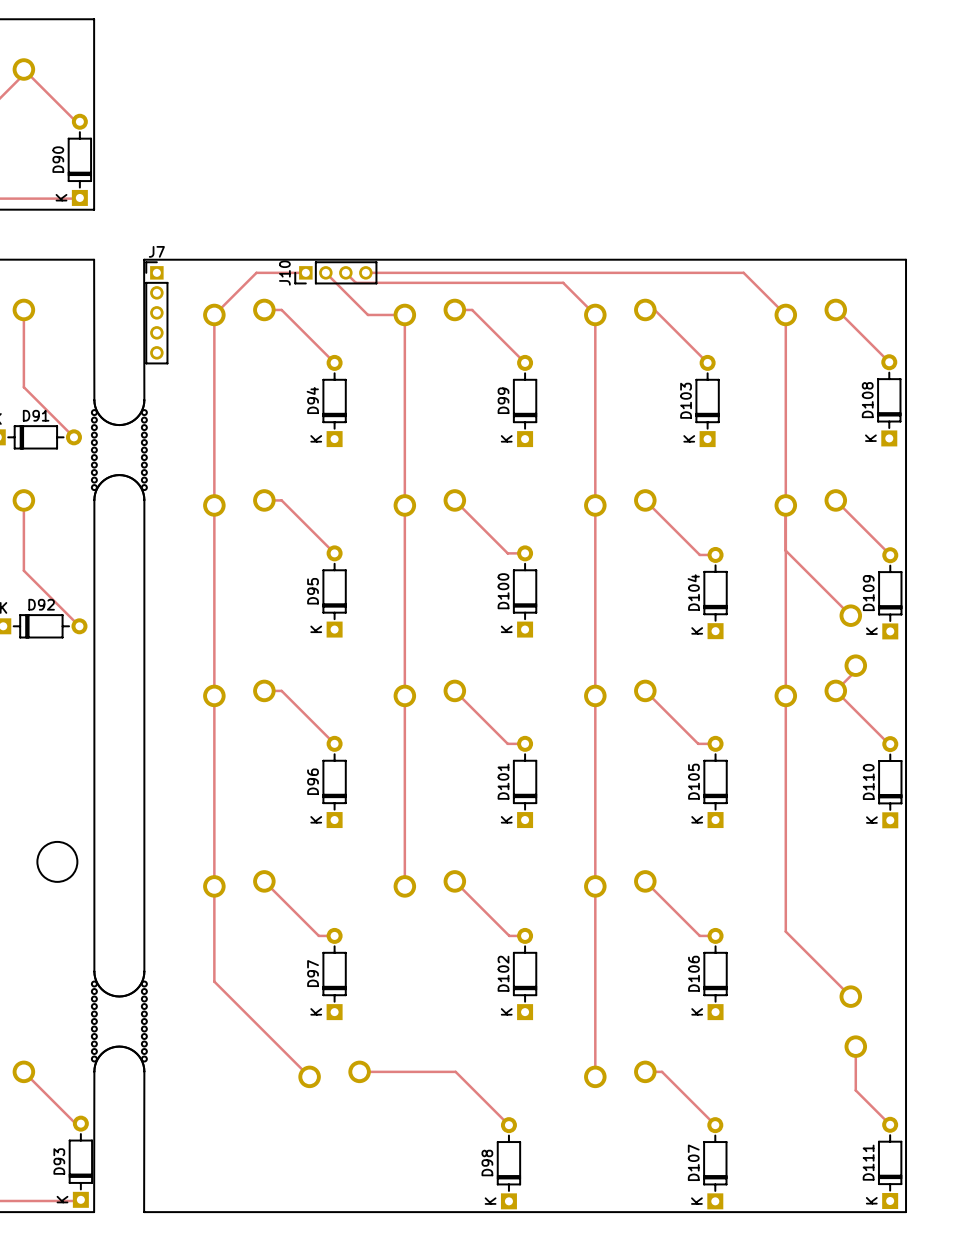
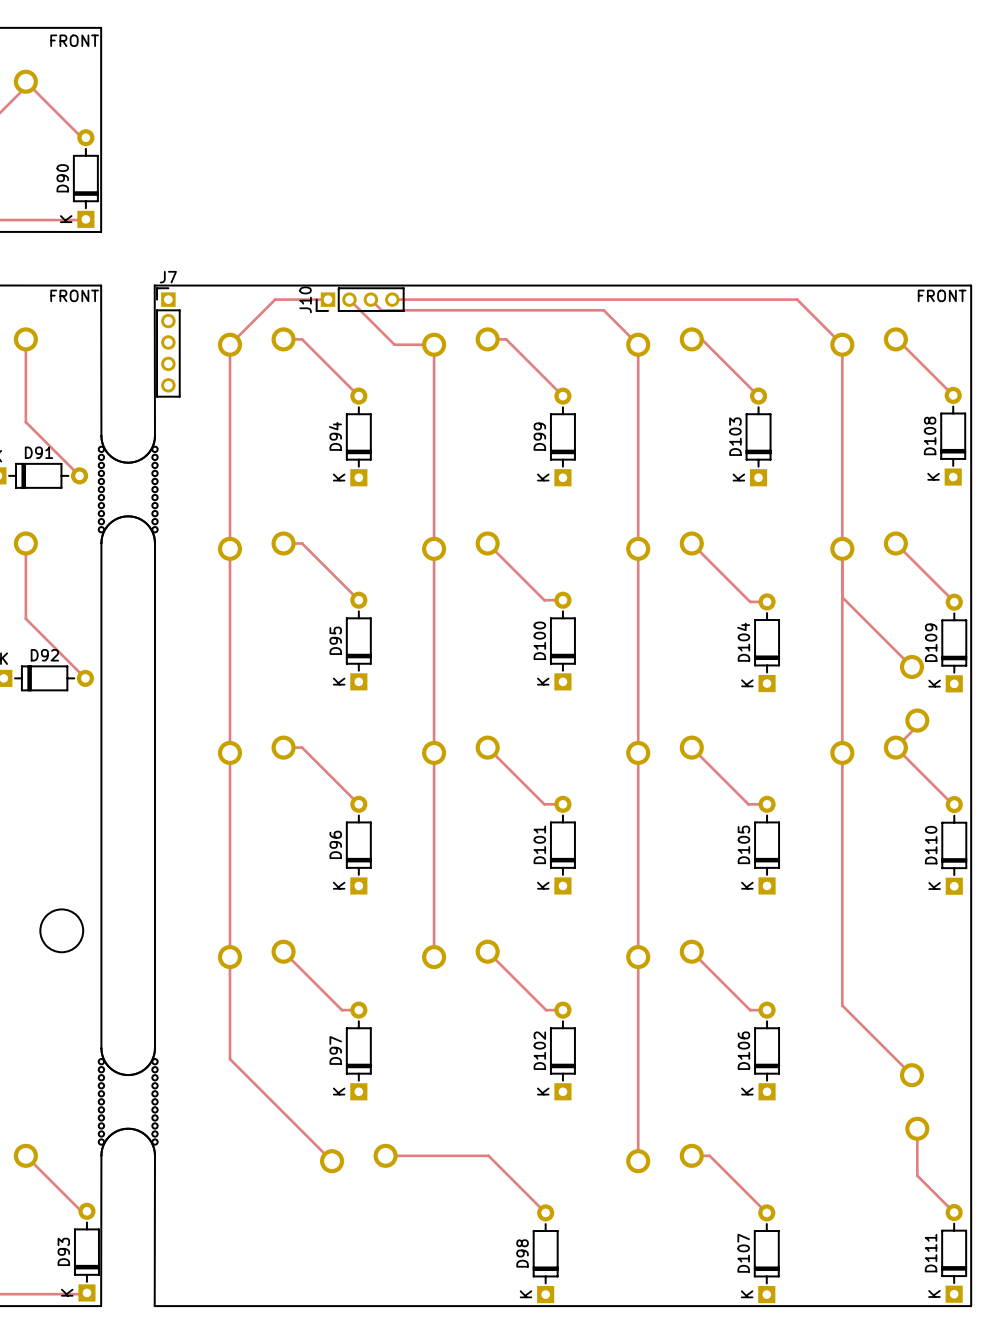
text: none -> FRONT (74, 40)
text: none -> FRONT (74, 295)
text: none -> FRONT (942, 295)

